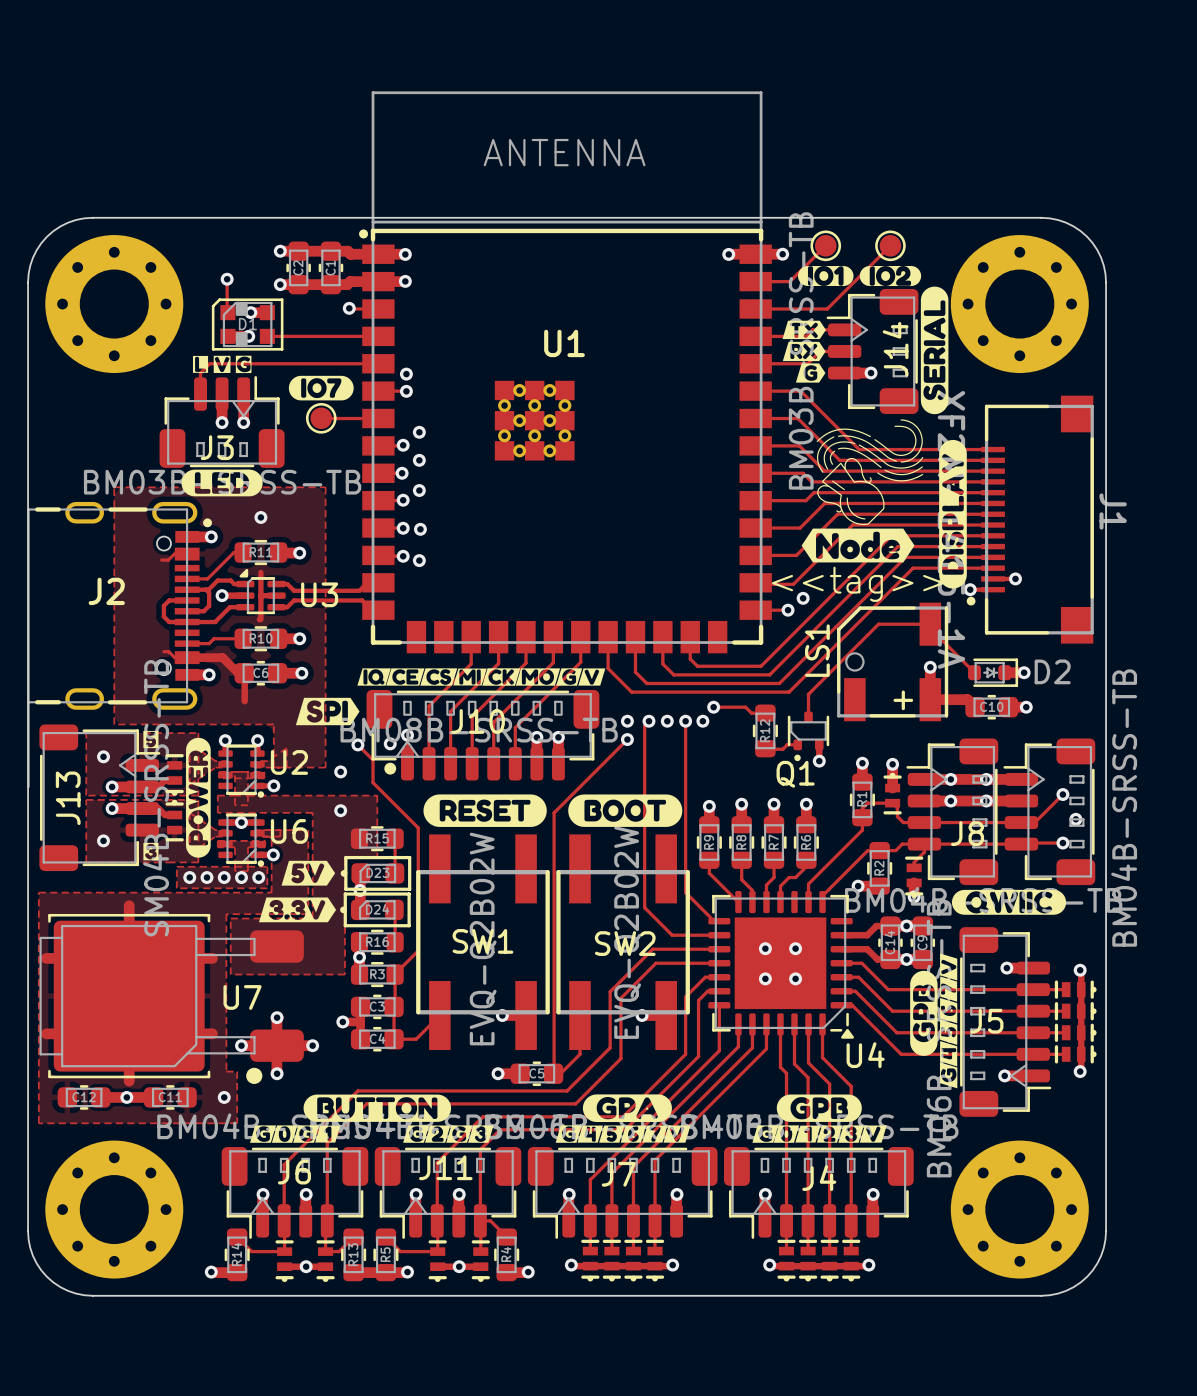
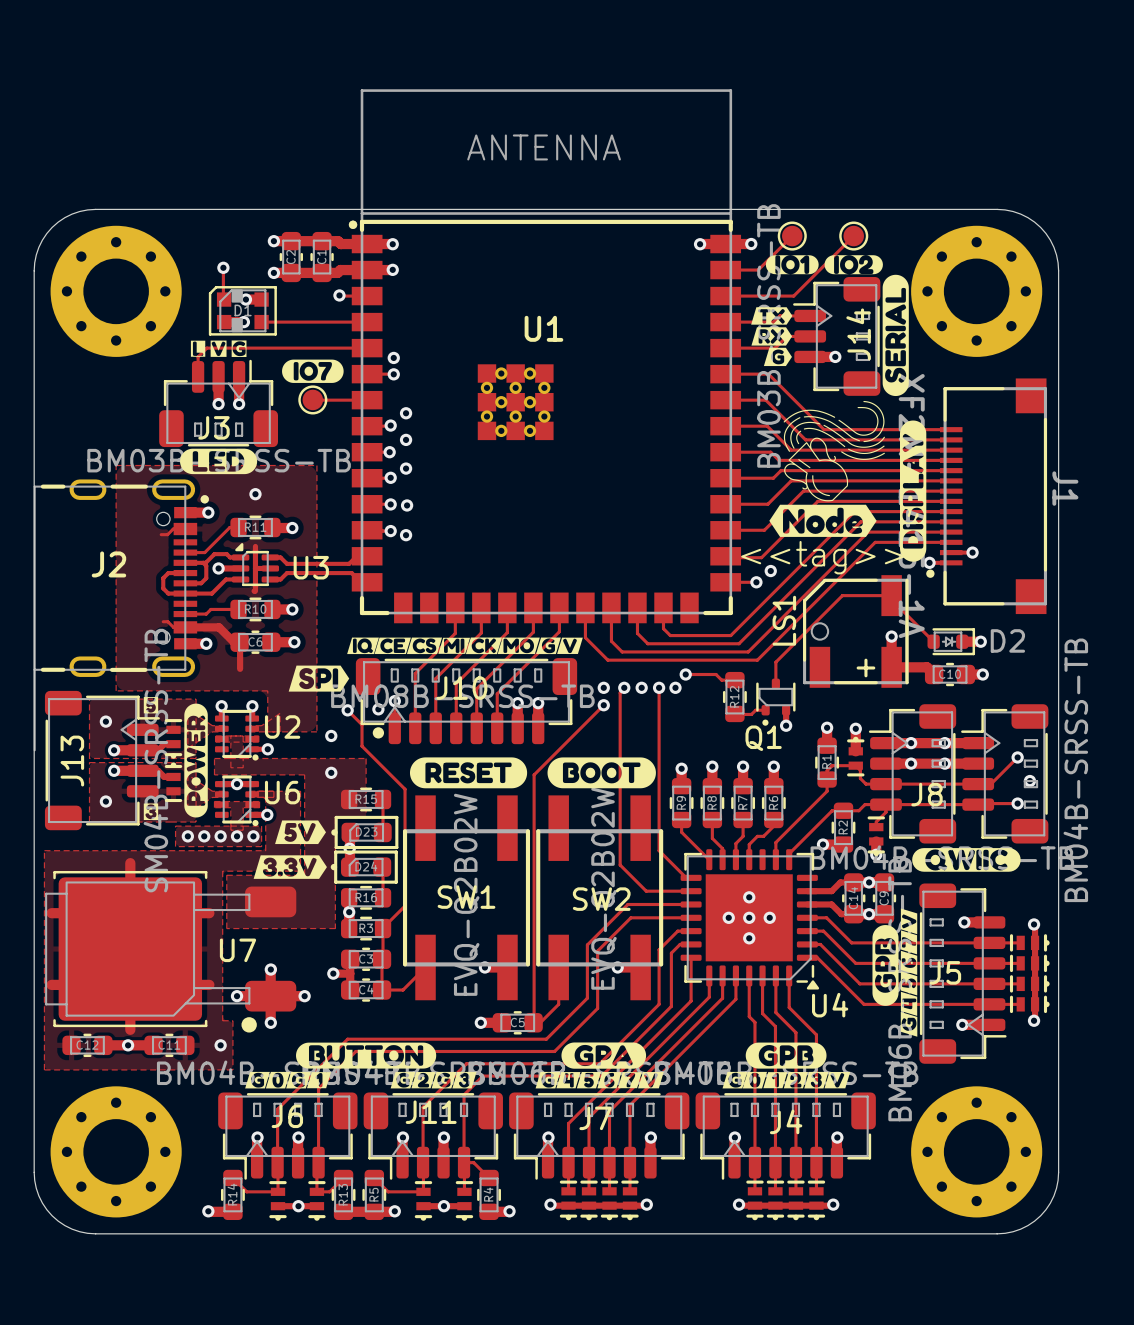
via: none -> (749, 897)
via: (765, 948) -> none
via: (795, 948) -> none
via: none -> (728, 917)
via: none -> (749, 917)
via: none -> (769, 917)
via: (765, 978) -> none
via: (795, 978) -> none
via: none -> (749, 938)

